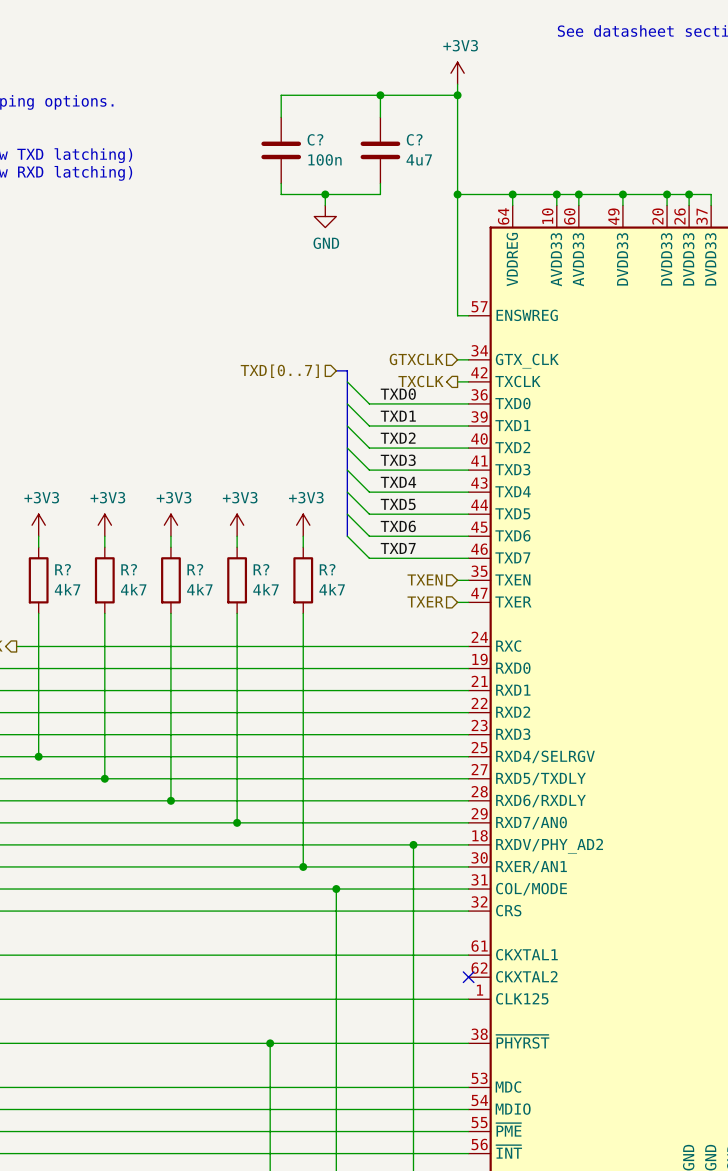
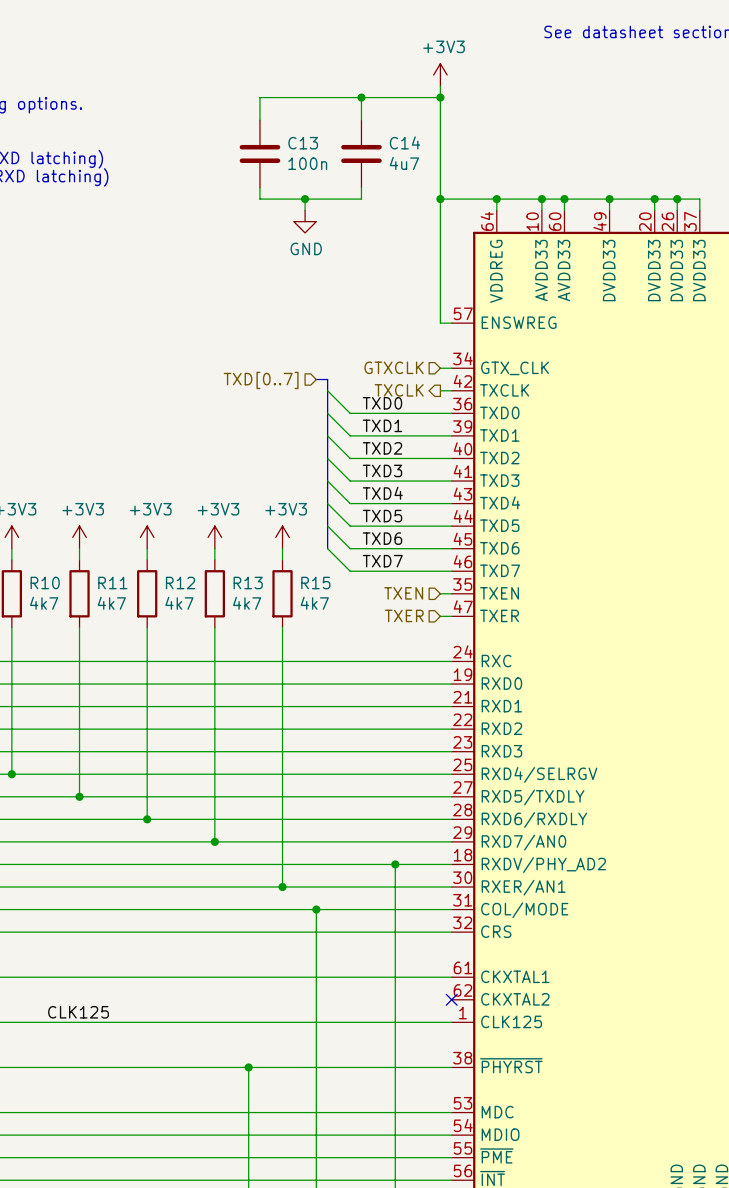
C? name: C? (315, 139) -> C13 (303, 143)
C? name: C? (414, 139) -> C14 (404, 142)
R? name: R? (63, 569) -> R10 (45, 582)
R? name: R? (129, 569) -> R11 (112, 582)
R? name: R? (195, 569) -> R12 (180, 582)
R? name: R? (261, 569) -> R13 (248, 582)
R? name: R? (327, 569) -> R15 (315, 582)
label: none -> CLK125 (78, 1012)

